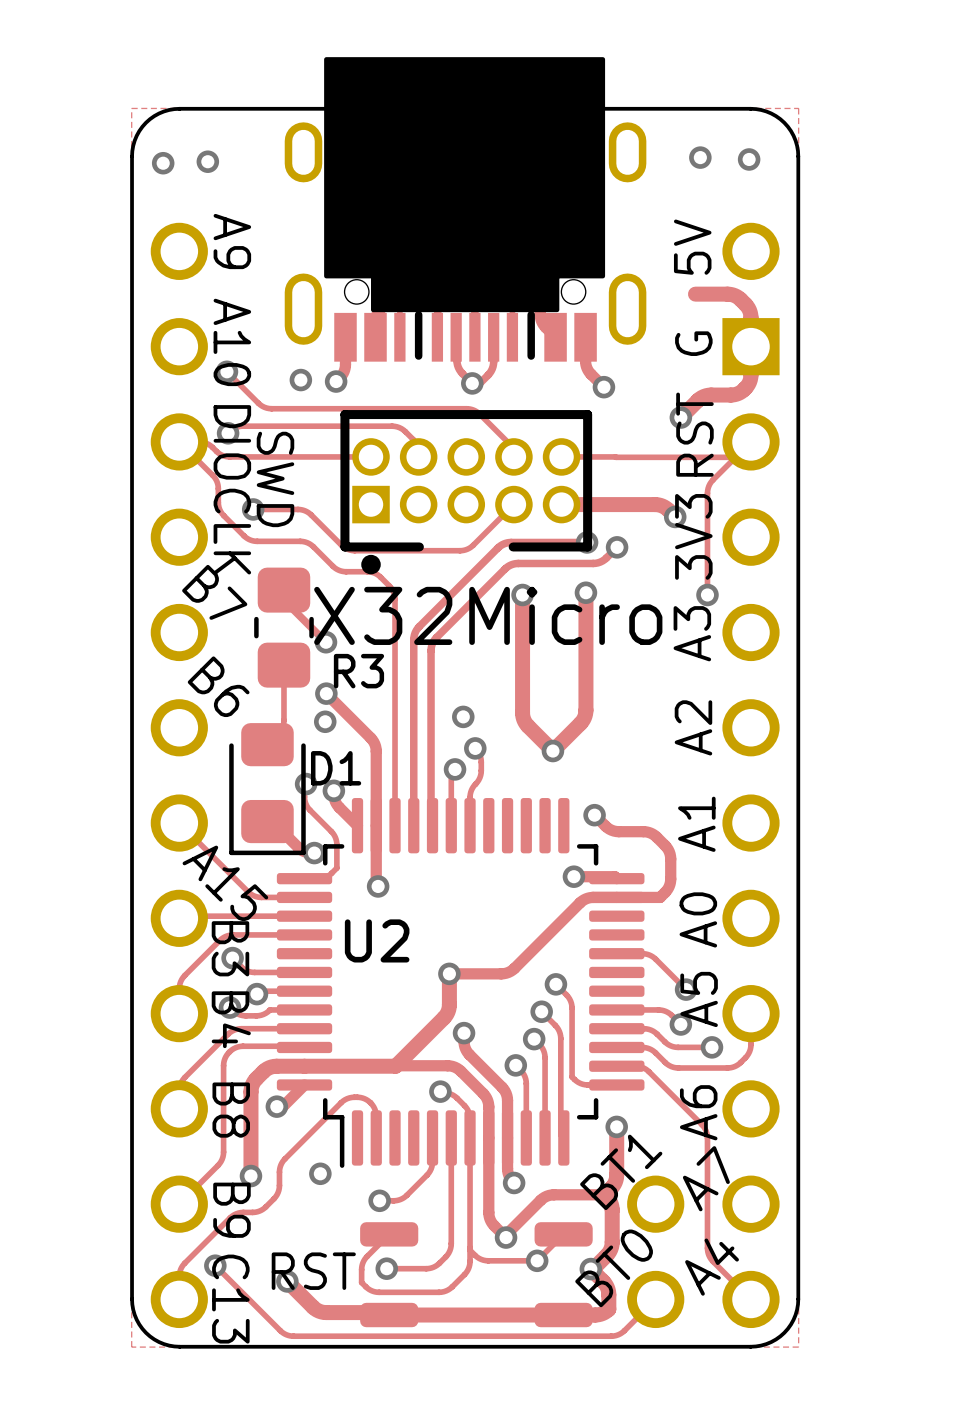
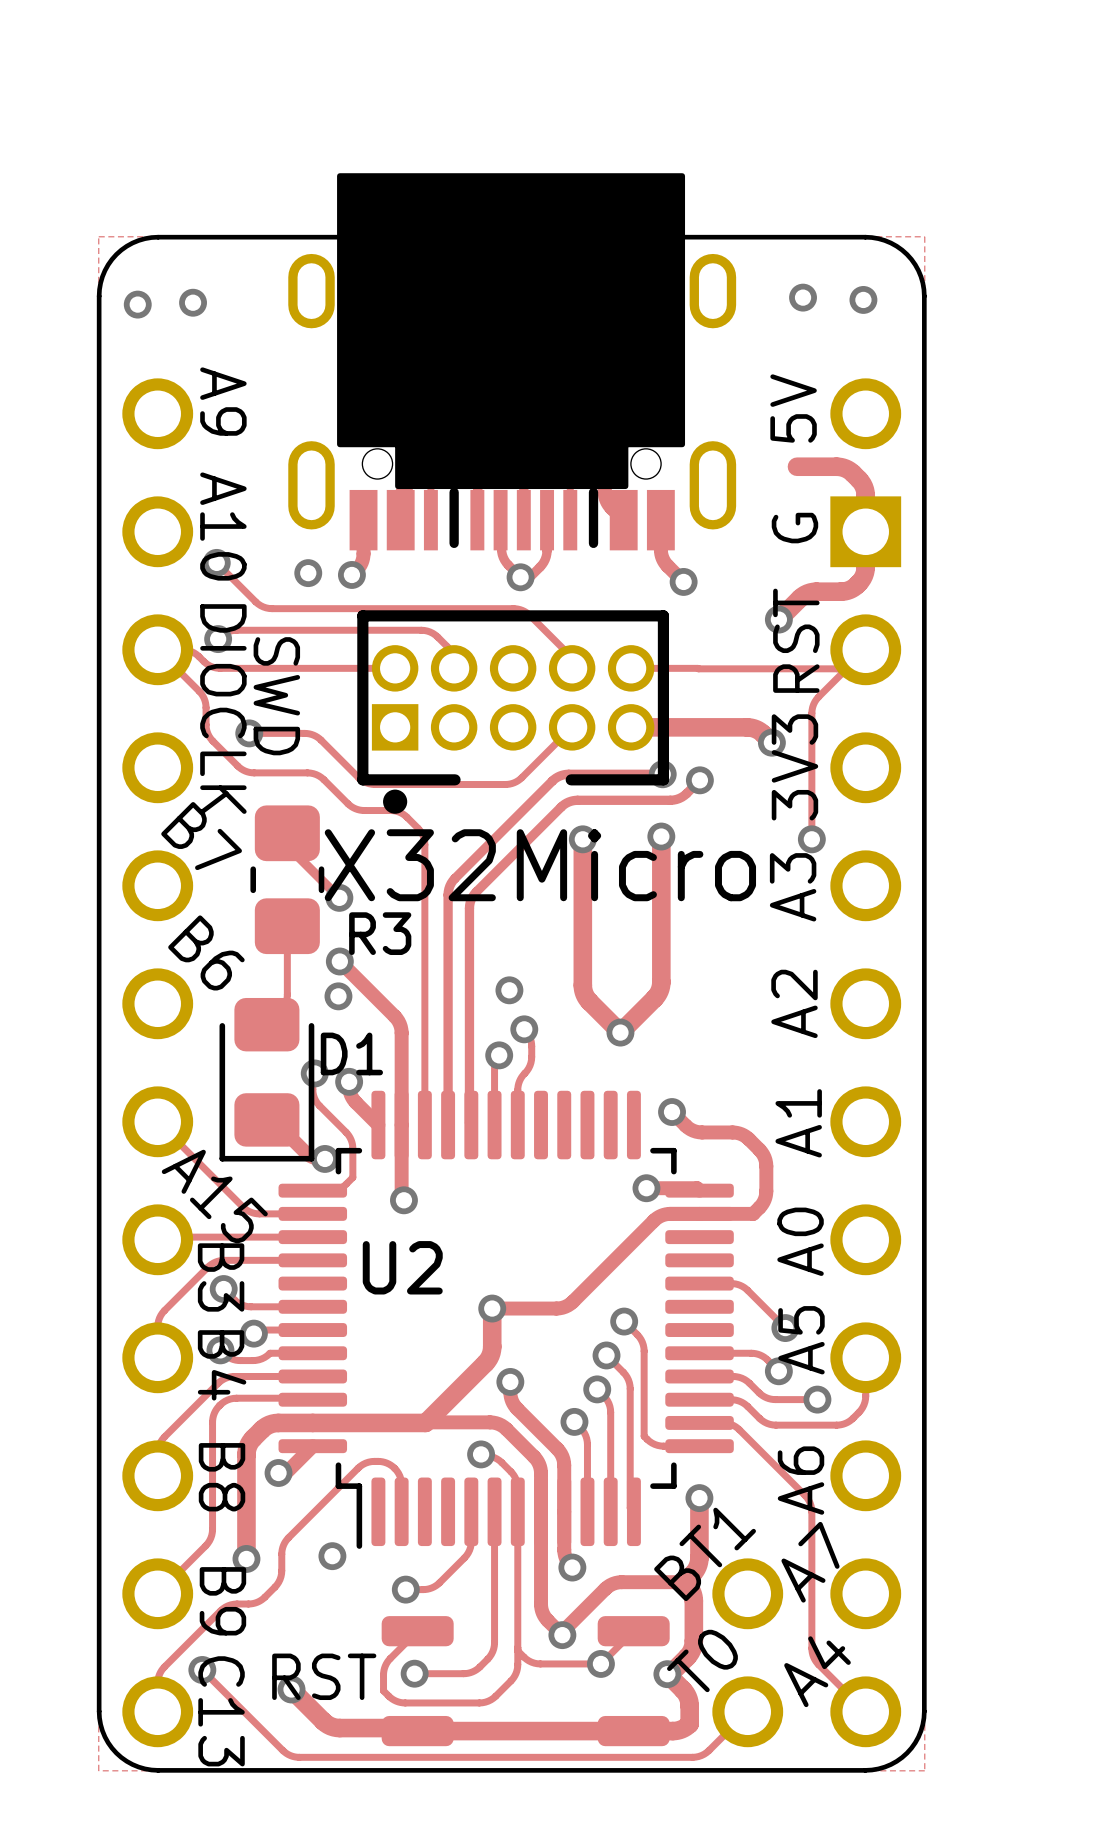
text: BT0 (614, 1268) -> T0 (702, 1660)

